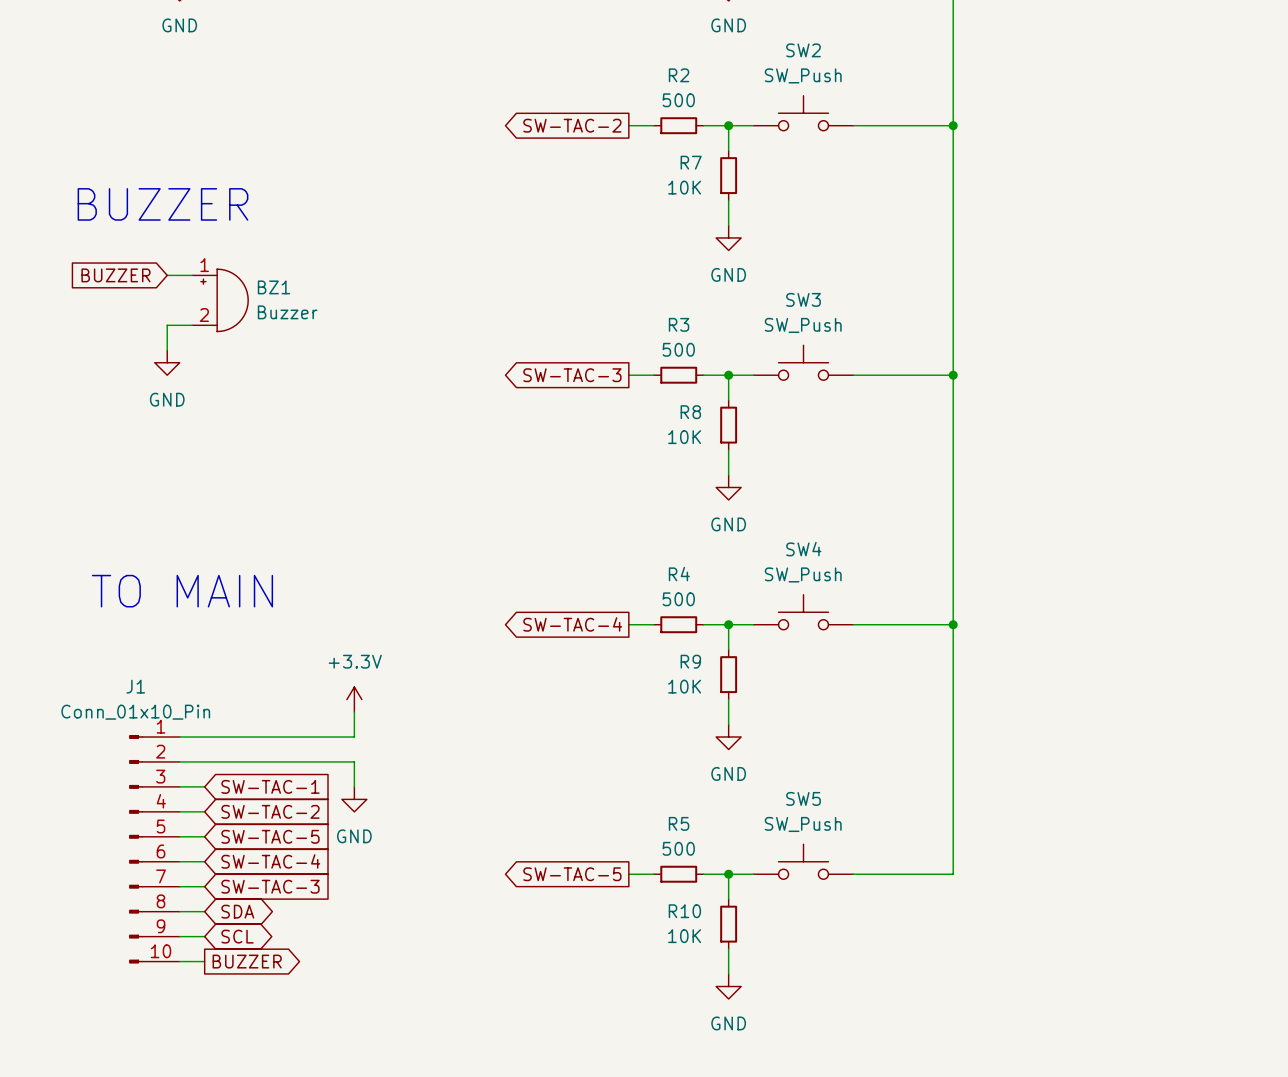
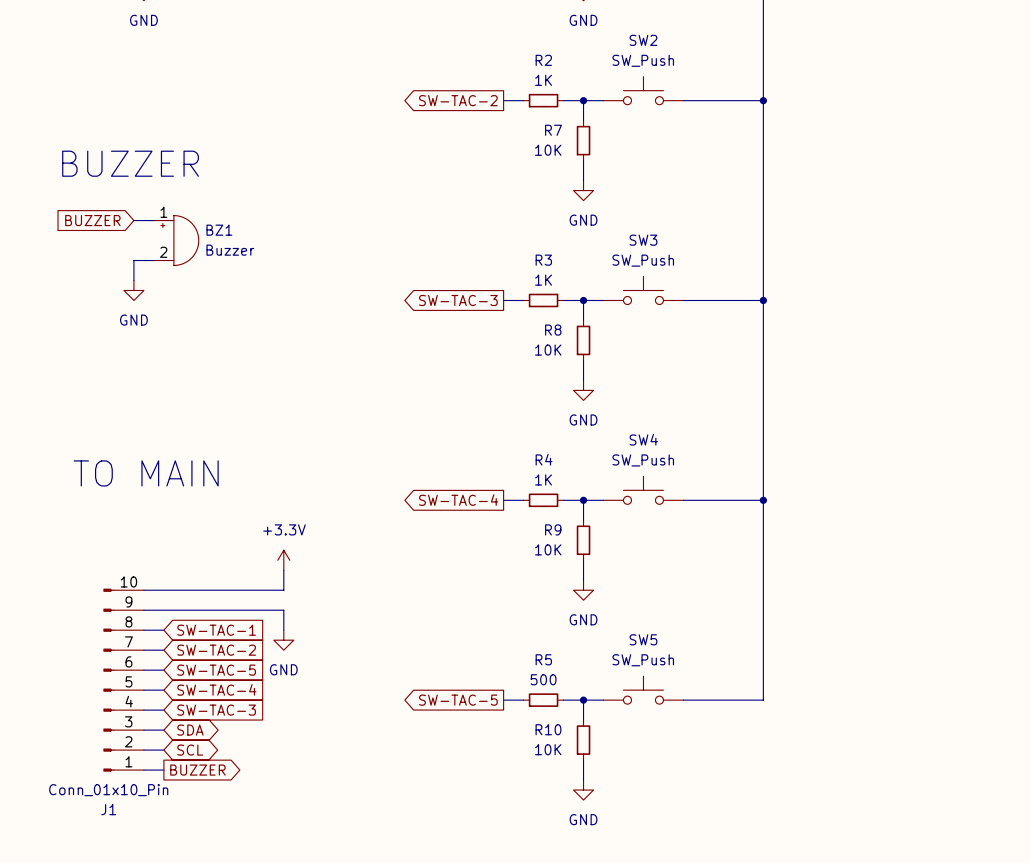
R2 value: 500 (678, 100) -> 1K (543, 80)
R3 value: 500 (678, 349) -> 1K (543, 280)
R4 value: 500 (678, 599) -> 1K (543, 479)
J1 flip: as is (136, 849) -> up-down (108, 680)

